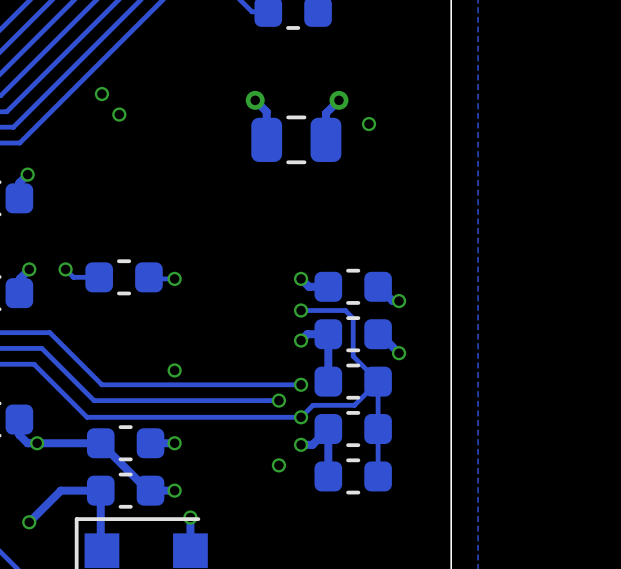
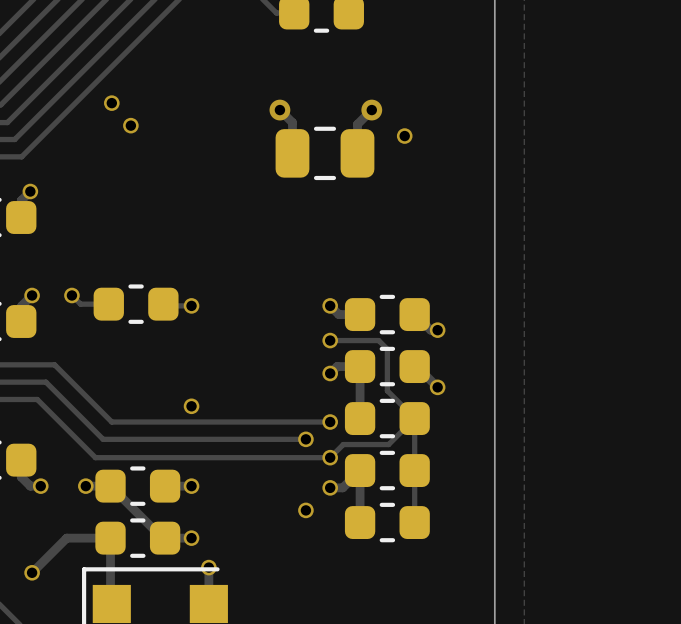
track: (78, 443) (37, 443) -> none
via: none -> (85, 486)

